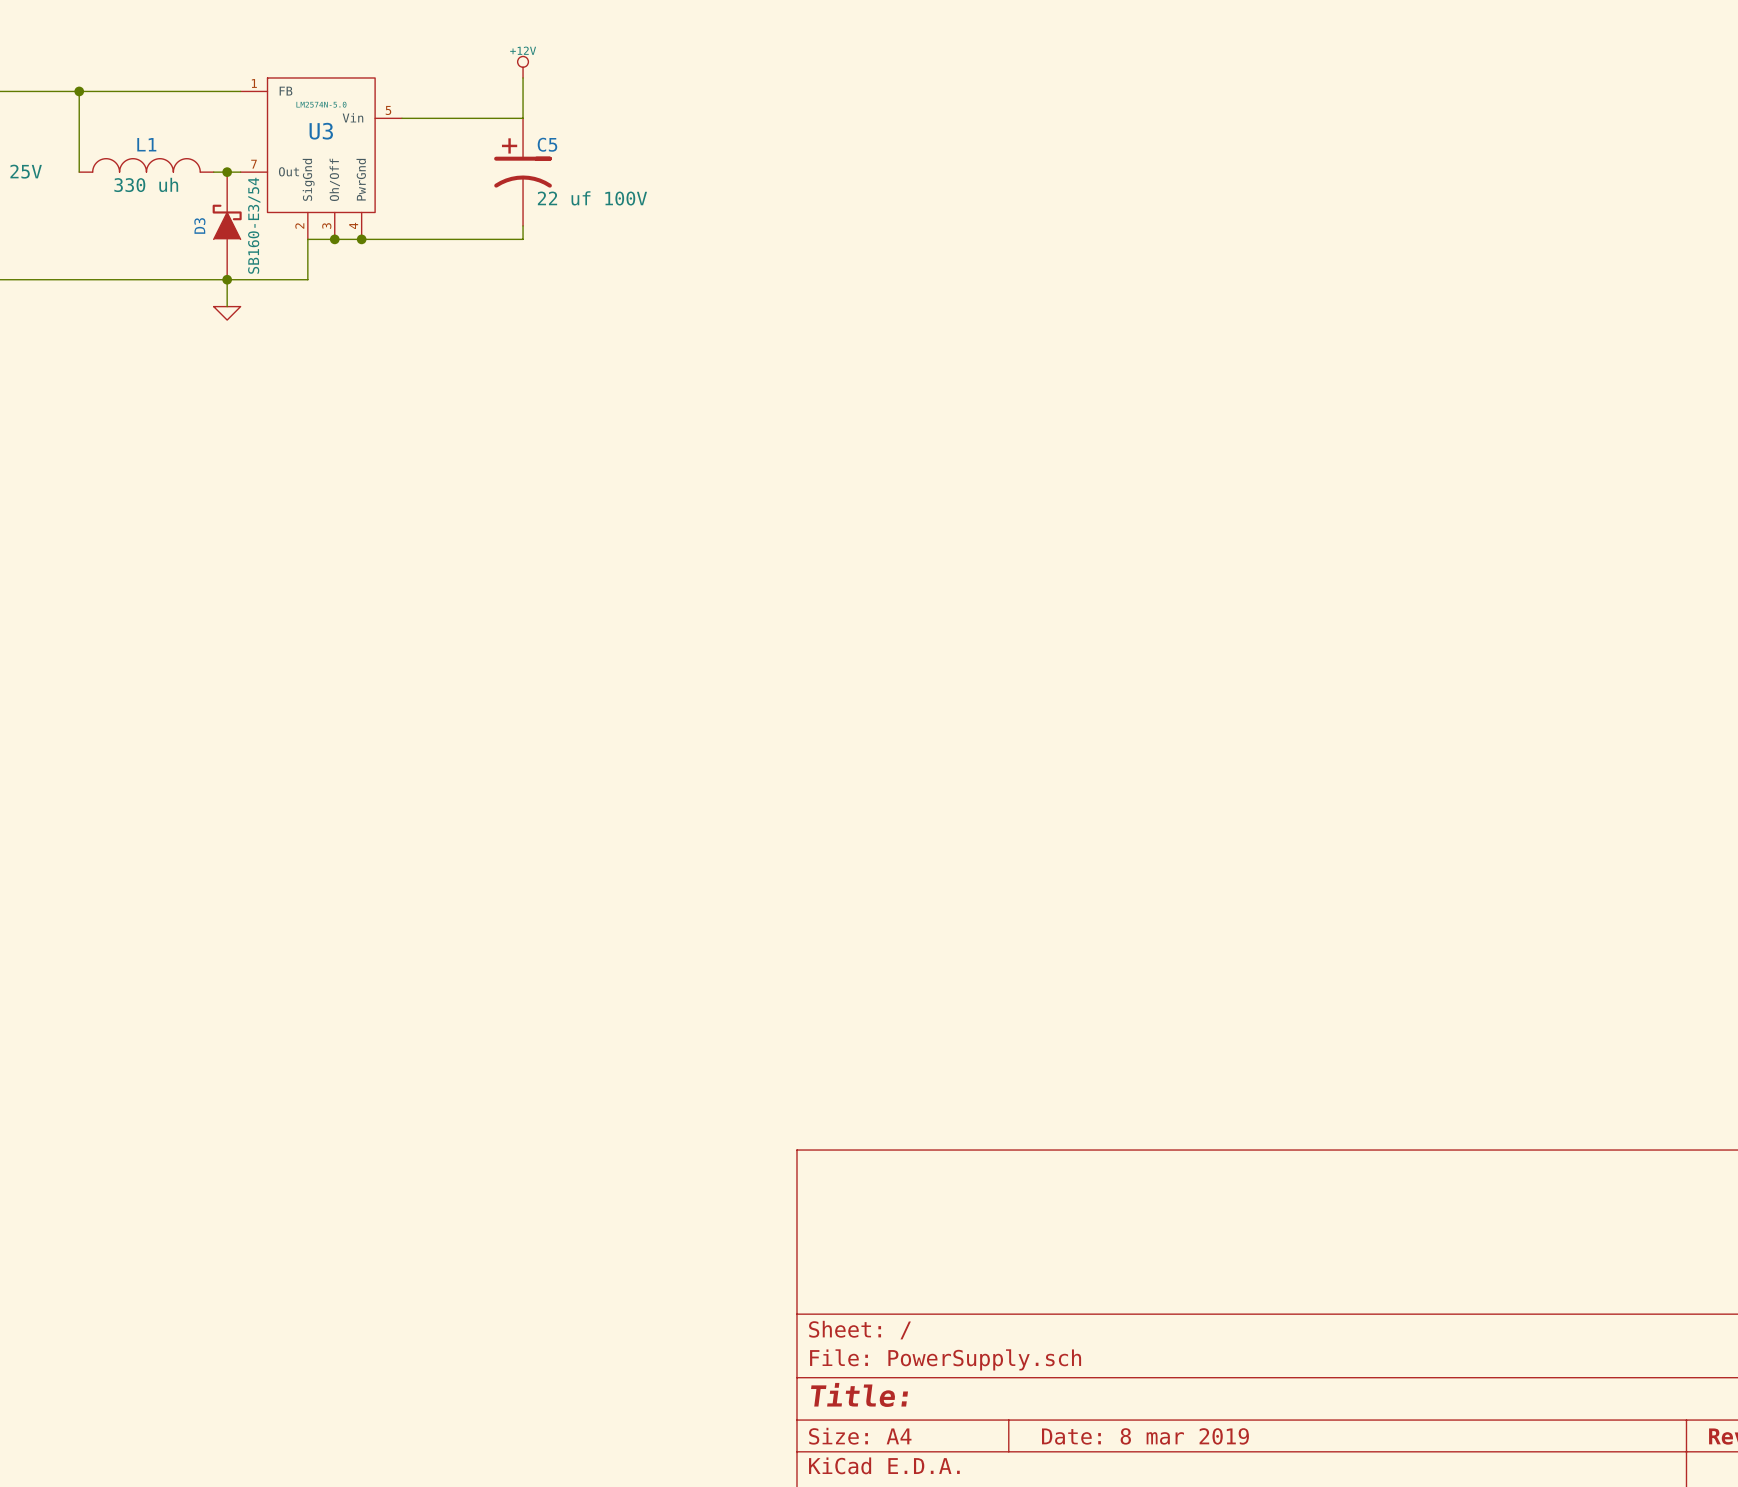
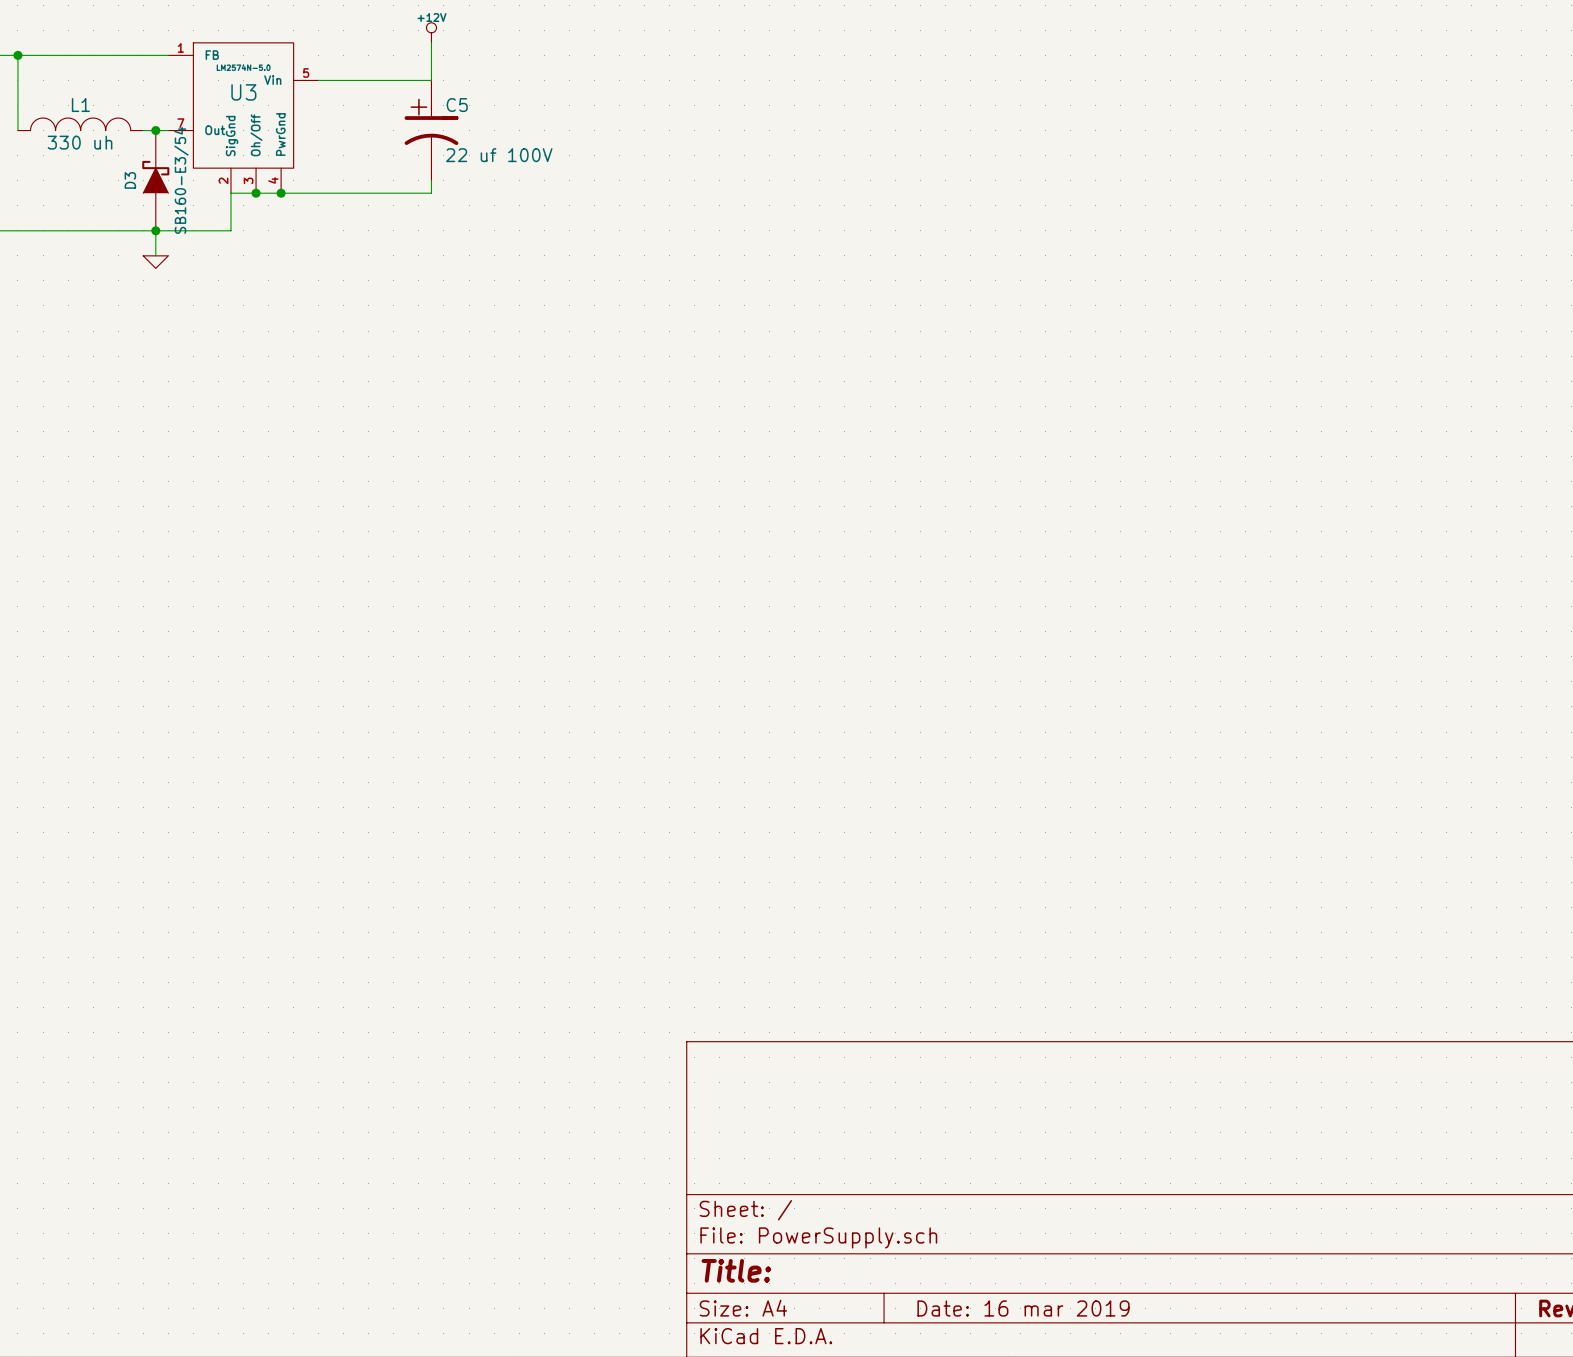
title block: Date: 8 mar 2019 (1145, 1436) -> Date: 16 mar 2019 (1023, 1308)

